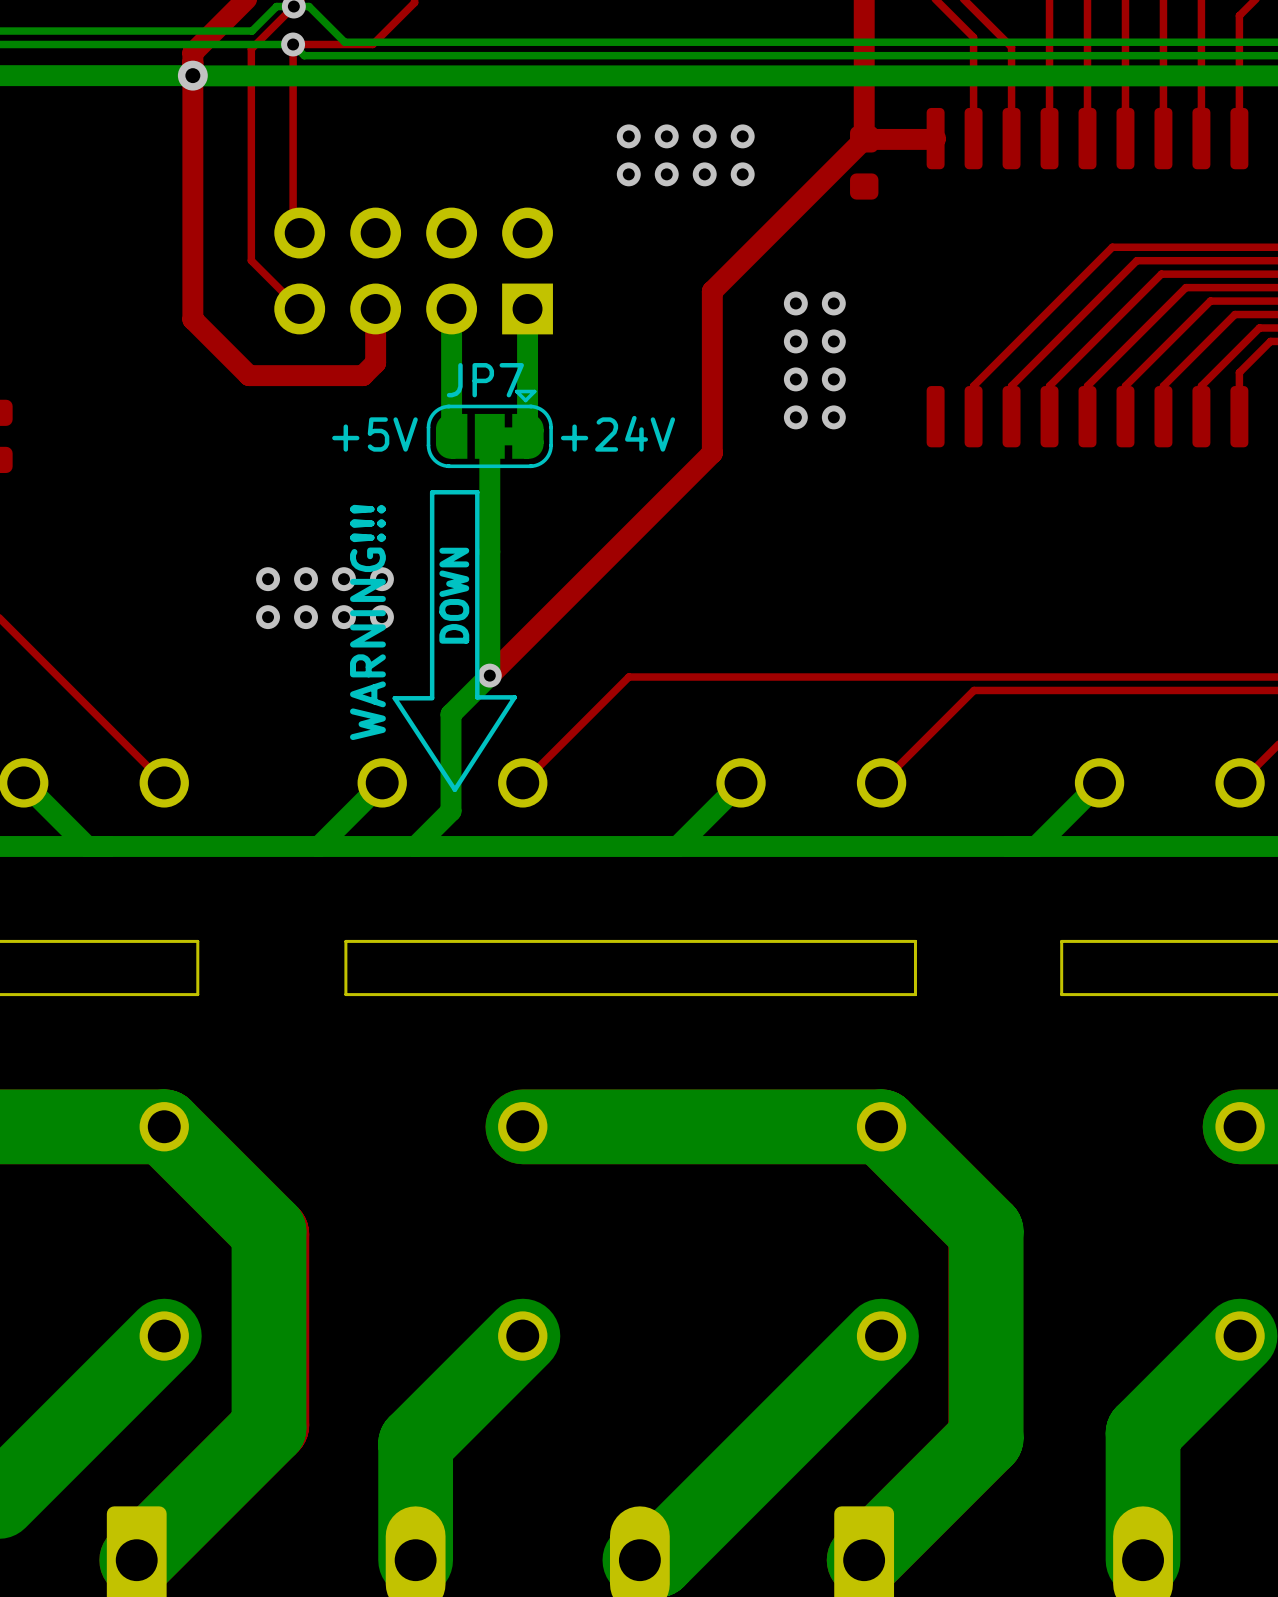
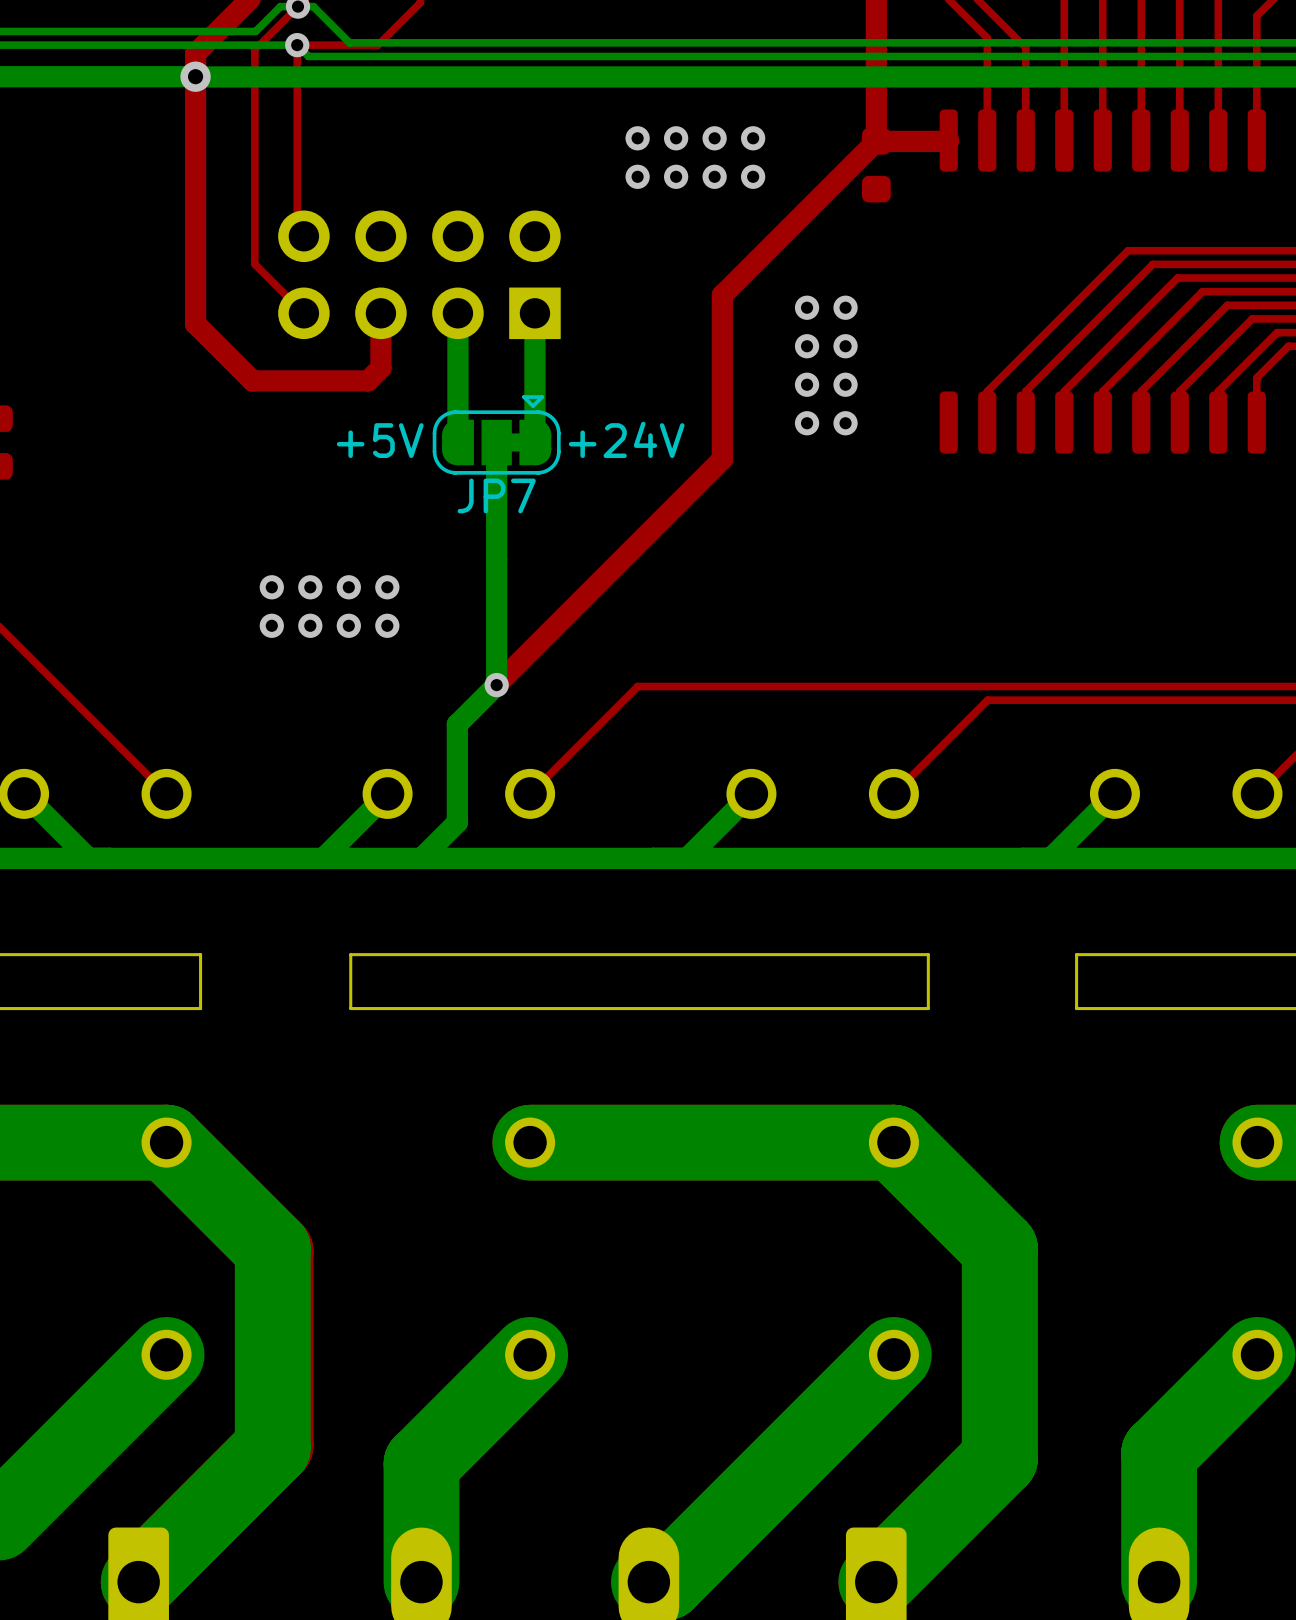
JP7 name position: JP7 (485, 380) -> JP7 (496, 495)
line: (432, 492) (477, 492) (477, 697) (514, 697) (454, 789) (394, 698) (432, 698) -> none
line: (432, 492) (432, 697) -> none
text: DOWN (454, 595) -> none
text: WARNING!!! (367, 622) -> none

